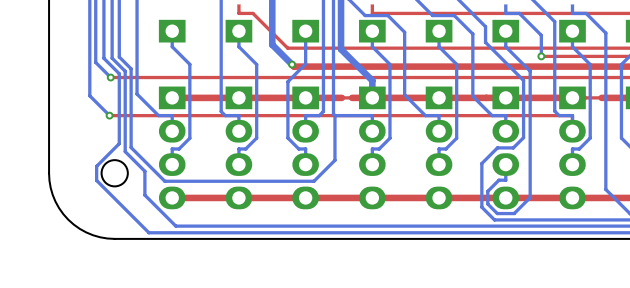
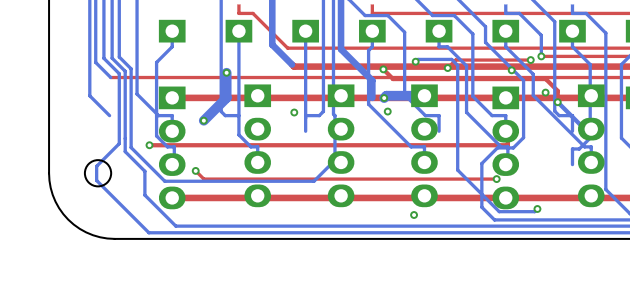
bottom track: (172, 46) (189, 64) (189, 138) (179, 148) (172, 148) (172, 164) -> (172, 46) (156, 62) (156, 135) (167, 146) (174, 146) (174, 162)
bottom track: (238, 46) (256, 64) (256, 138) (245, 148) (238, 148) (238, 164) -> (238, 46) (238, 115)
bottom track: (372, 46) (389, 64) (389, 138) (379, 148) (372, 148) (372, 164) -> (372, 46) (368, 50) (368, 104) (411, 146) (424, 146) (424, 162)
bottom track: (439, 46) (451, 59) -> (415, 61) (417, 59) (451, 59)
bottom track: none -> (439, 46) (447, 46) (466, 65) (466, 112) (501, 146) (507, 146) (507, 162)
top track: none -> (530, 60) (455, 60) (447, 68)
via: none -> (530, 60)
via: none -> (415, 61)
bottom track: (305, 63) (287, 81) (287, 138) (298, 148) (305, 148) (305, 164) -> (305, 63) (305, 115)
via: (292, 64) -> none
bottom track: (456, 64) (456, 138) (445, 148) (439, 148) (439, 164) -> (456, 64) (457, 170) (499, 211) (534, 211) (537, 208)
via: none -> (447, 68)
top track: none -> (383, 69) (393, 79) (545, 79) (557, 90) (557, 102)
via: none -> (383, 69)
via: none -> (511, 70)
bottom track: (530, 71) (530, 197) (514, 213) (497, 213) (487, 204) (487, 191) (498, 180) (505, 180) (505, 164) -> (530, 71) (533, 74) (533, 95) (584, 146) (591, 146) (591, 162)
bottom track: none -> (226, 72) (226, 97) (203, 120)
via: none -> (226, 72)
via: (110, 77) -> none
via: none -> (545, 92)
bottom track: none -> (424, 95) (386, 95) (384, 98)
via: none -> (384, 98)
bottom track: none -> (557, 102) (584, 129) (591, 129)
via: none -> (557, 102)
via: none -> (387, 111)
via: none -> (294, 112)
top track: (109, 115) (572, 115) (572, 131) -> none
via: (109, 115) -> none
bottom track: (334, 115) (372, 115) (372, 131) -> none
via: none -> (203, 120)
top track: none -> (507, 129) (507, 145) (149, 145)
bottom track: none -> (238, 131) (238, 134) (250, 146) (257, 146) (257, 162)
via: none -> (149, 145)
part: none -> (341, 145)
part position: (238, 147) -> (257, 145)
part: (305, 147) -> none
part: (372, 147) -> none
part position: (439, 147) -> (424, 145)
part position: (572, 147) -> (591, 145)
top track: none -> (195, 170) (203, 179) (496, 179)
via: none -> (195, 170)
round board edge position: (114, 173) -> (98, 173)
via: none -> (496, 179)
via: none -> (537, 208)
via: none -> (414, 215)

